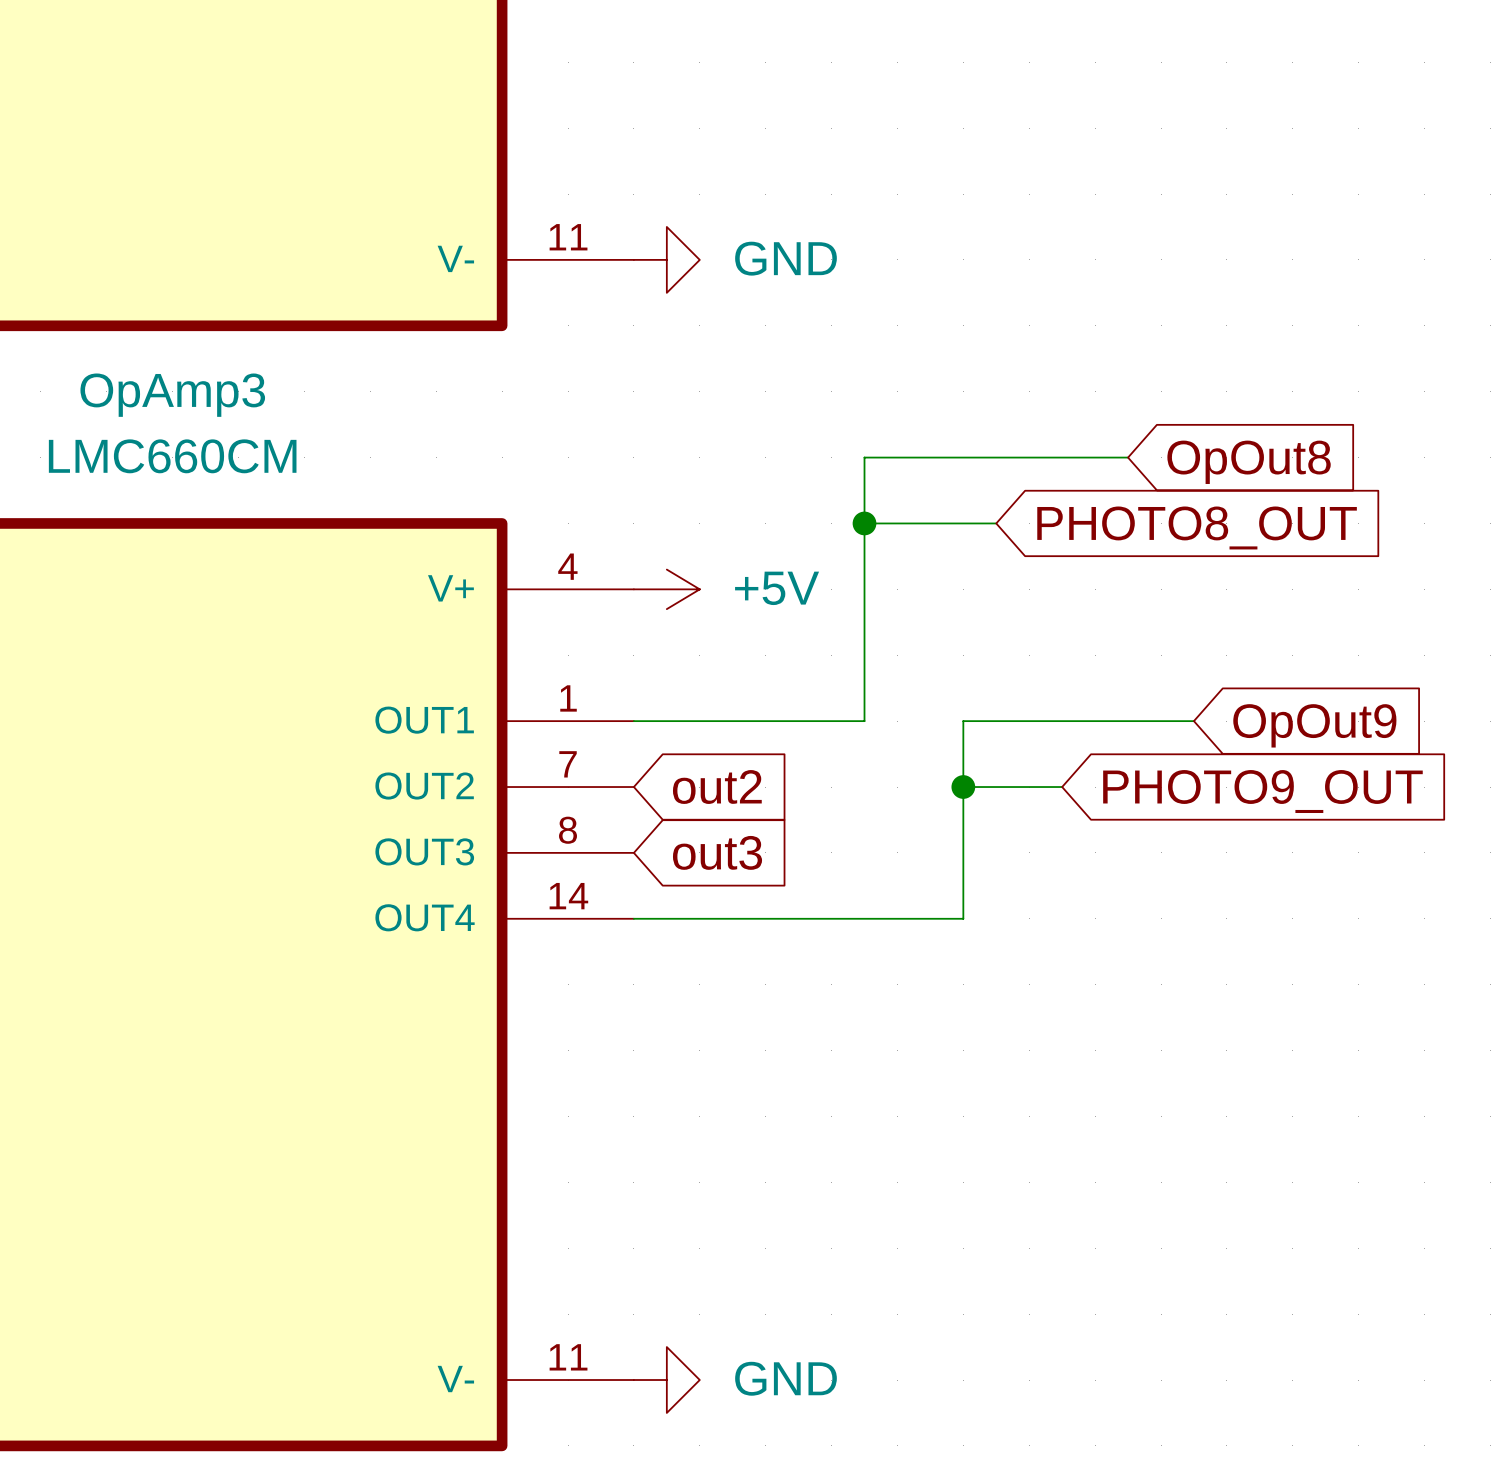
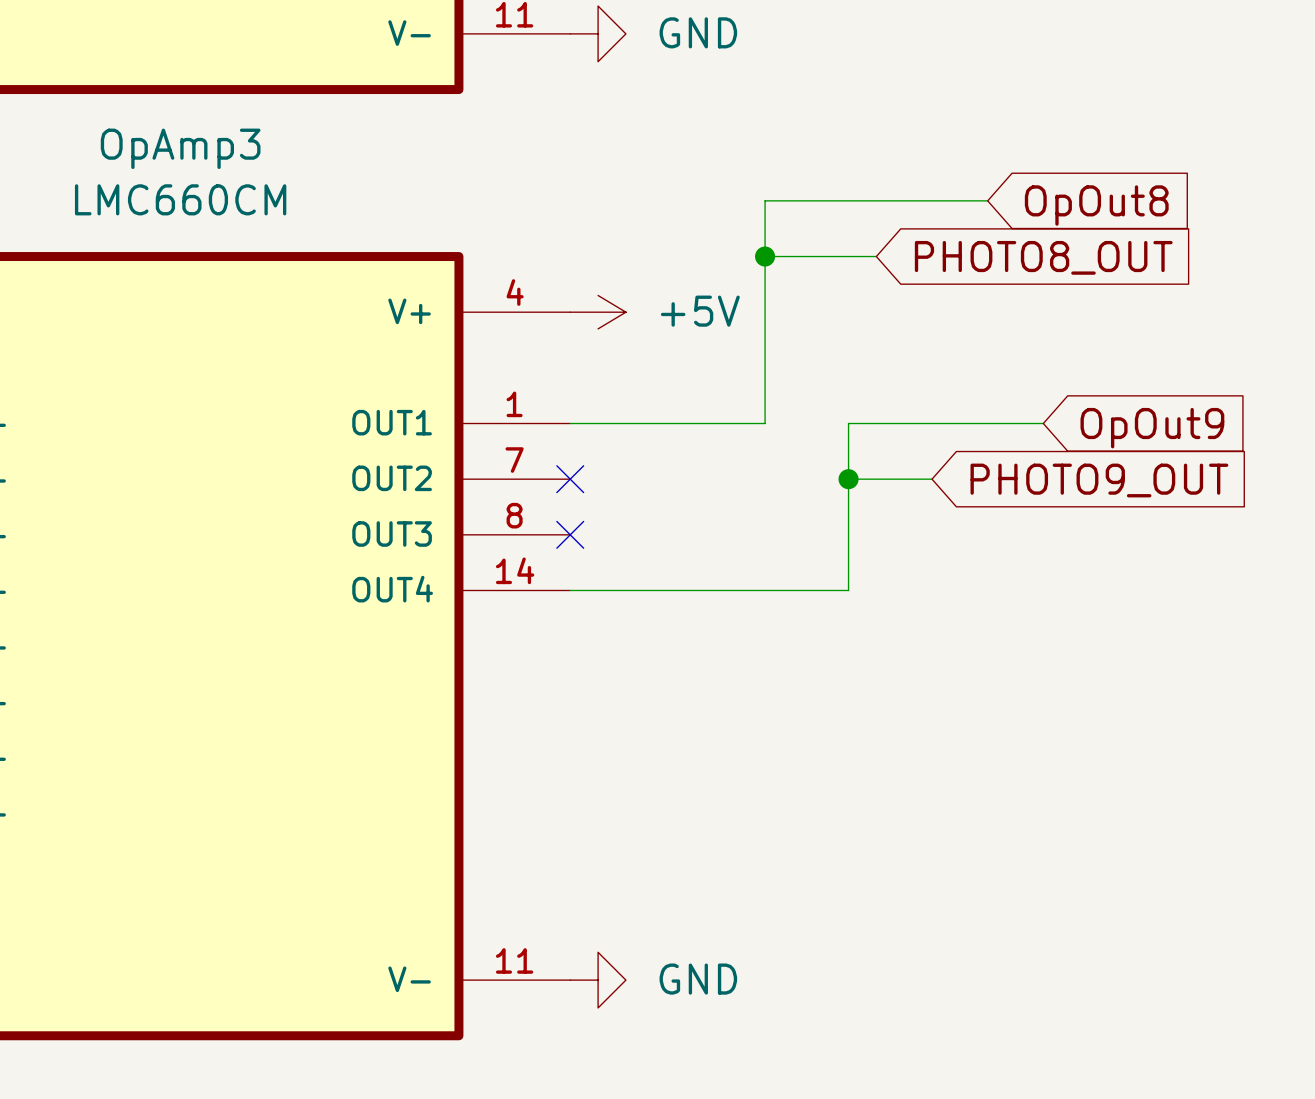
no-connect mark: none -> (570, 479)
global label: out2 (717, 787) -> none
no-connect mark: none -> (570, 534)
global label: out3 (717, 852) -> none

